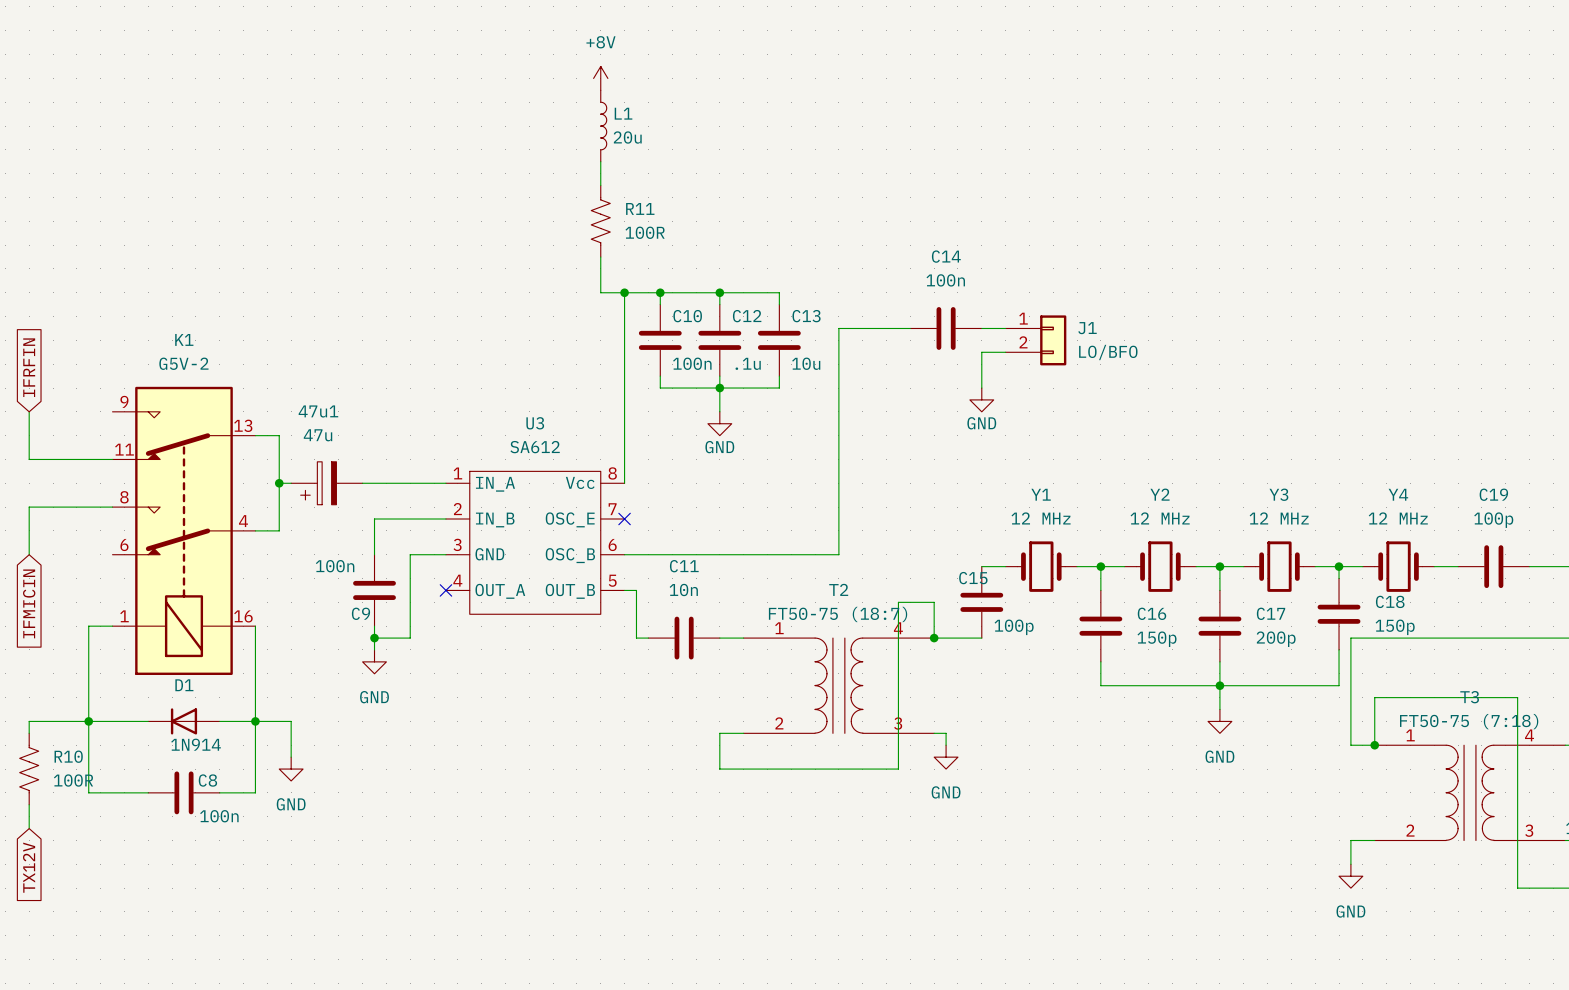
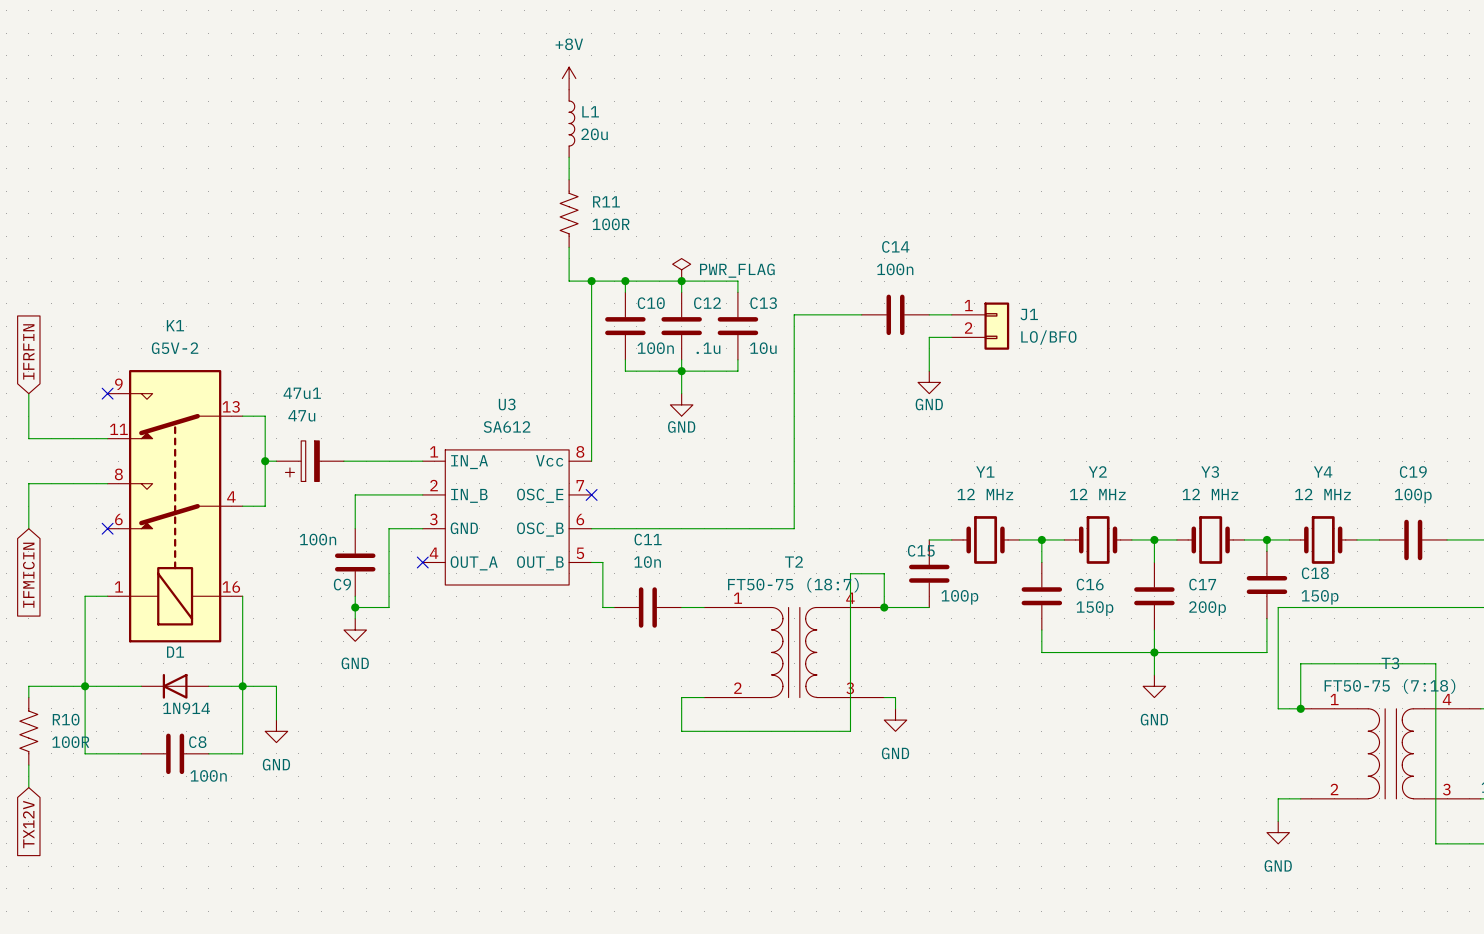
power symbol: none -> PWR_FLAG (681, 269)
no-connect mark: none -> (107, 393)
no-connect mark: none -> (107, 528)

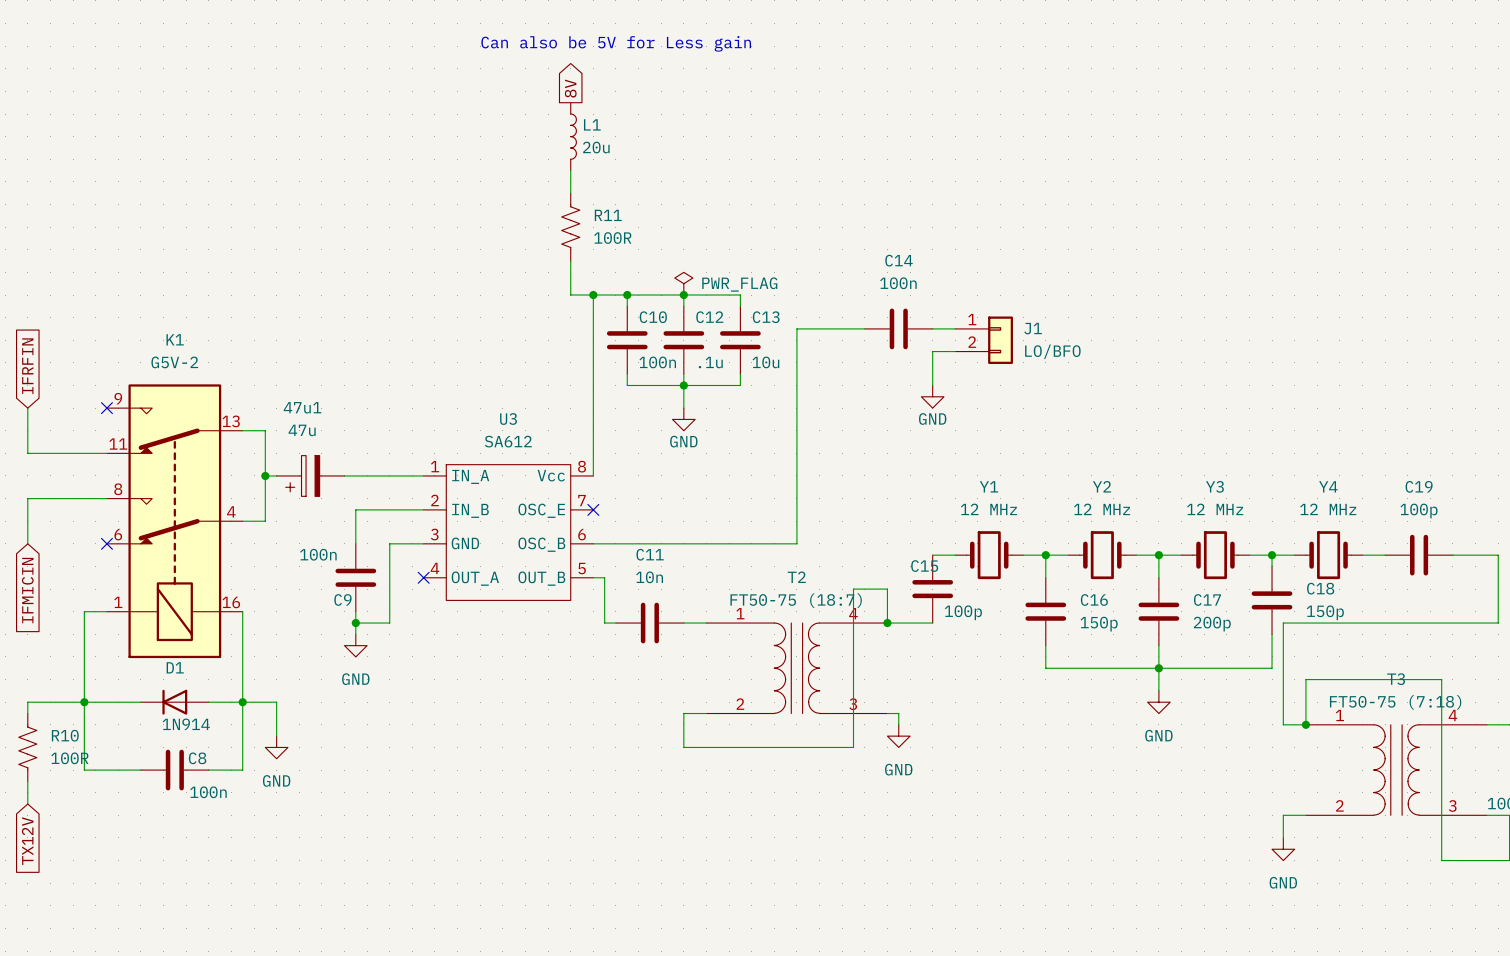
text: none -> Can also be 5V for Less gain (616, 43)
global label: none -> 8V (570, 88)
power symbol: +8V (569, 78) -> none

